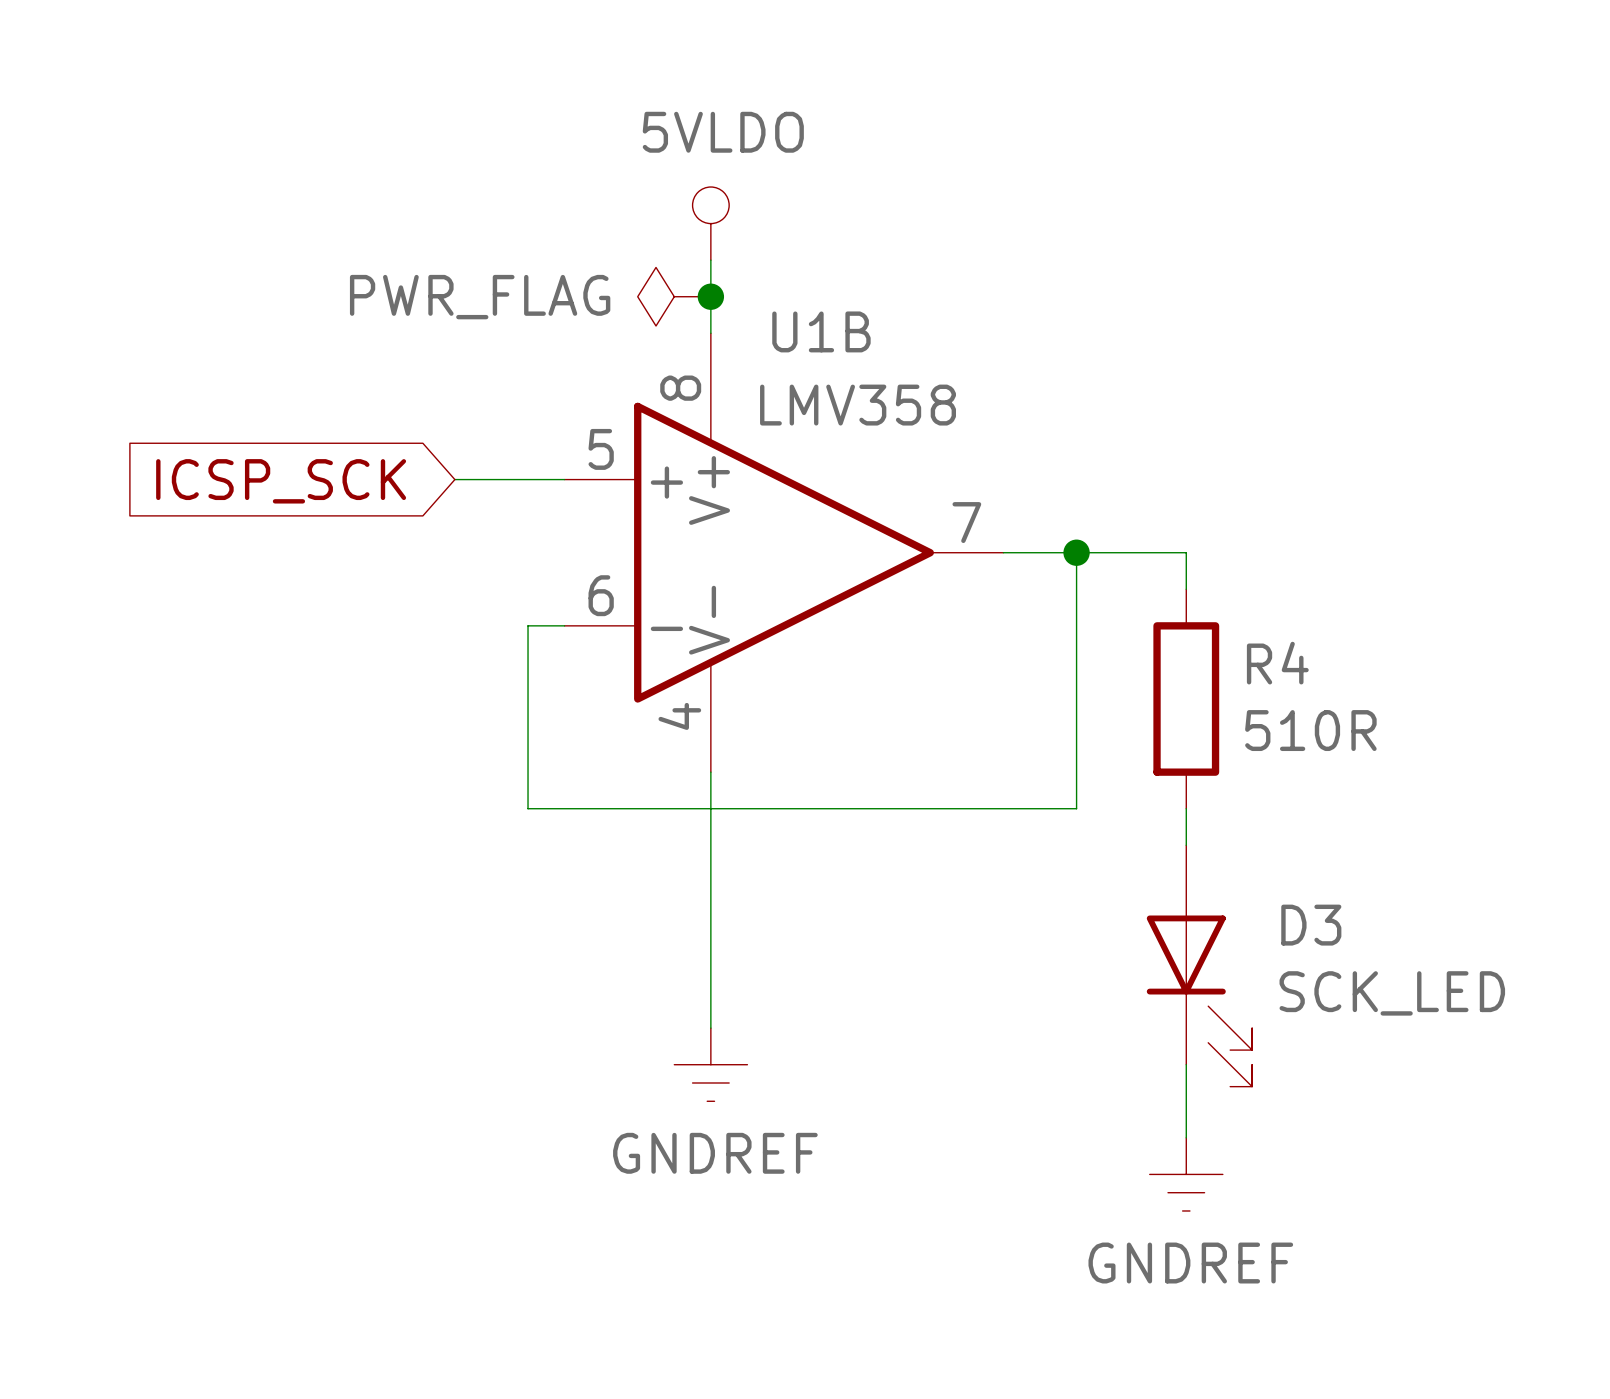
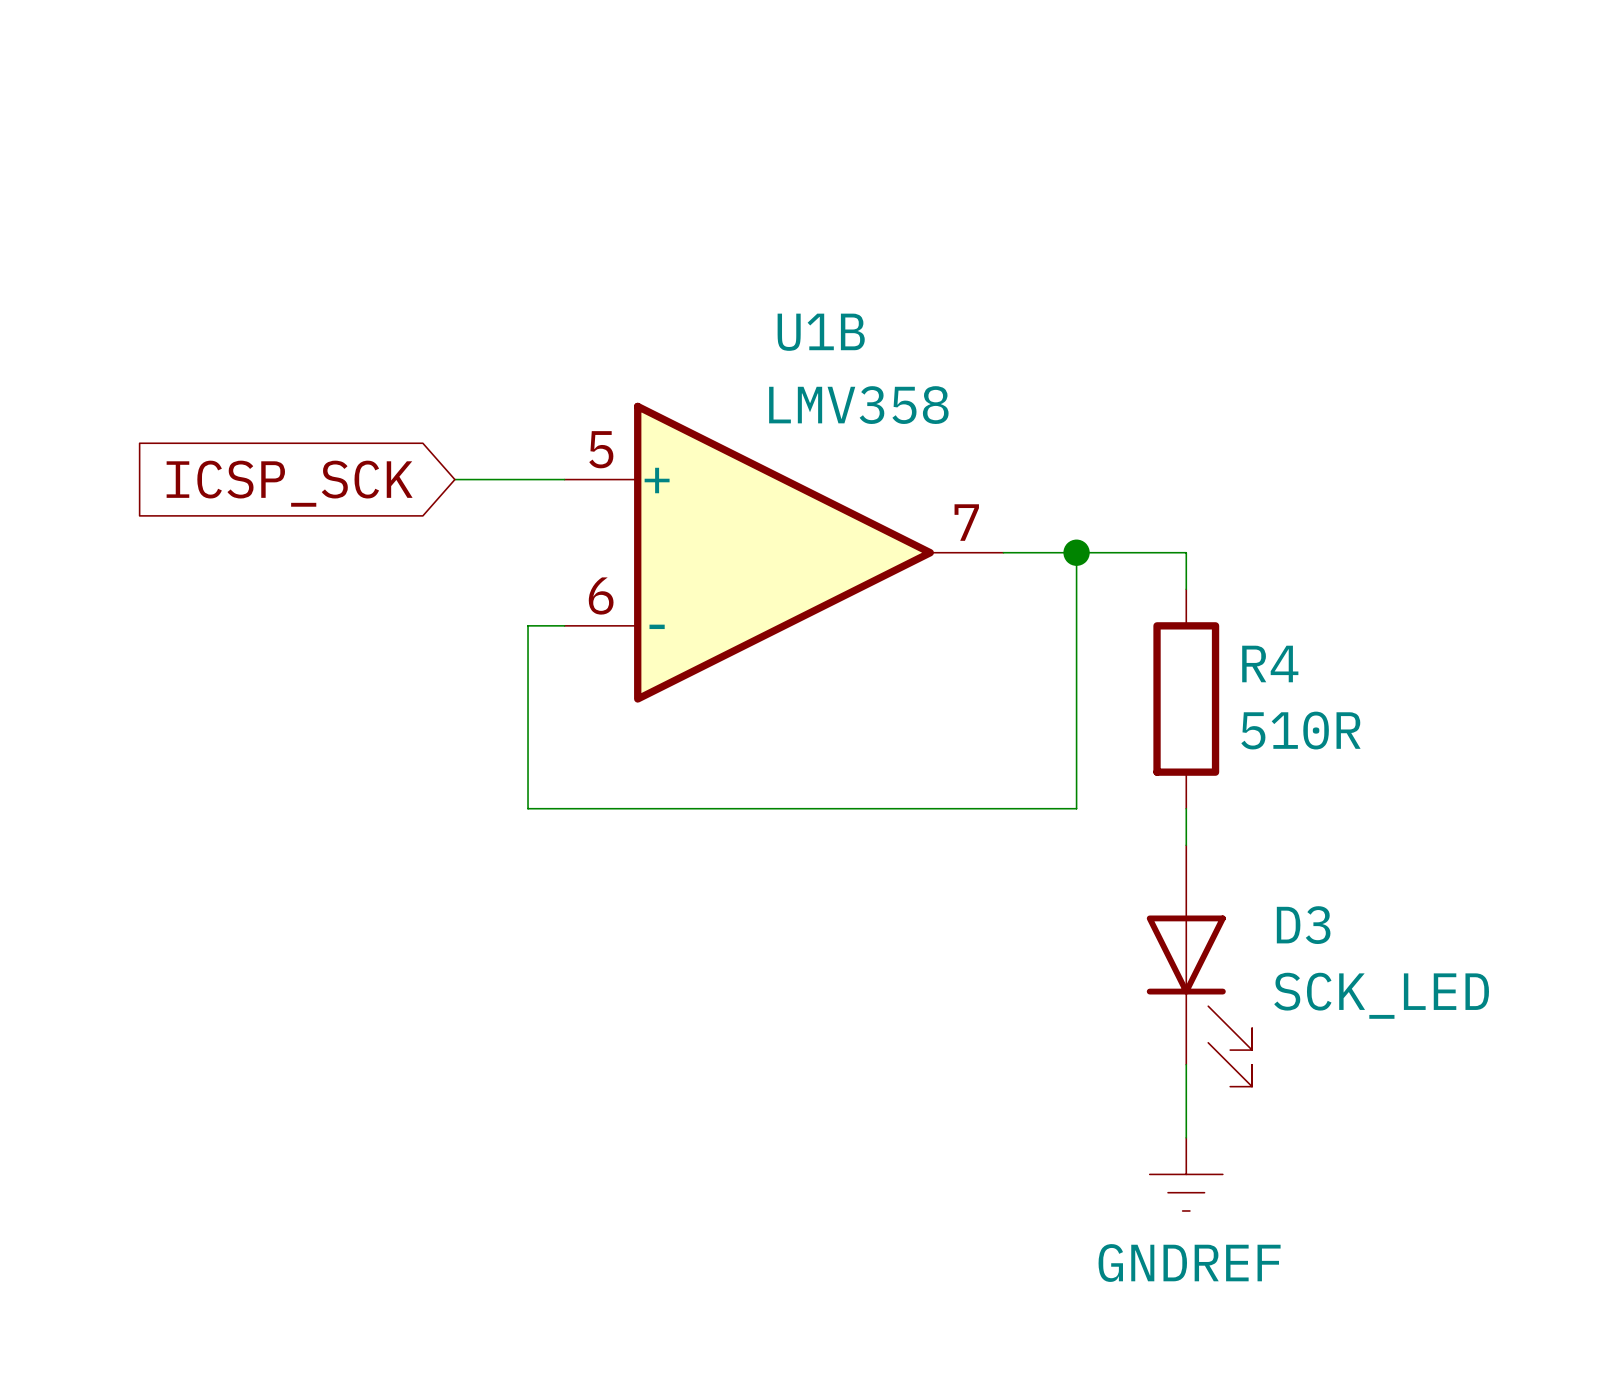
power symbol: 5VLDO (710, 223) -> none
wire: (710, 260) (710, 333) -> none
power symbol: PWR_FLAG (674, 296) -> none
junction: (710, 296) -> none
part: (710, 552) -> none
wire: (710, 772) (710, 1028) -> none
power symbol: GNDREF (710, 1064) -> none

